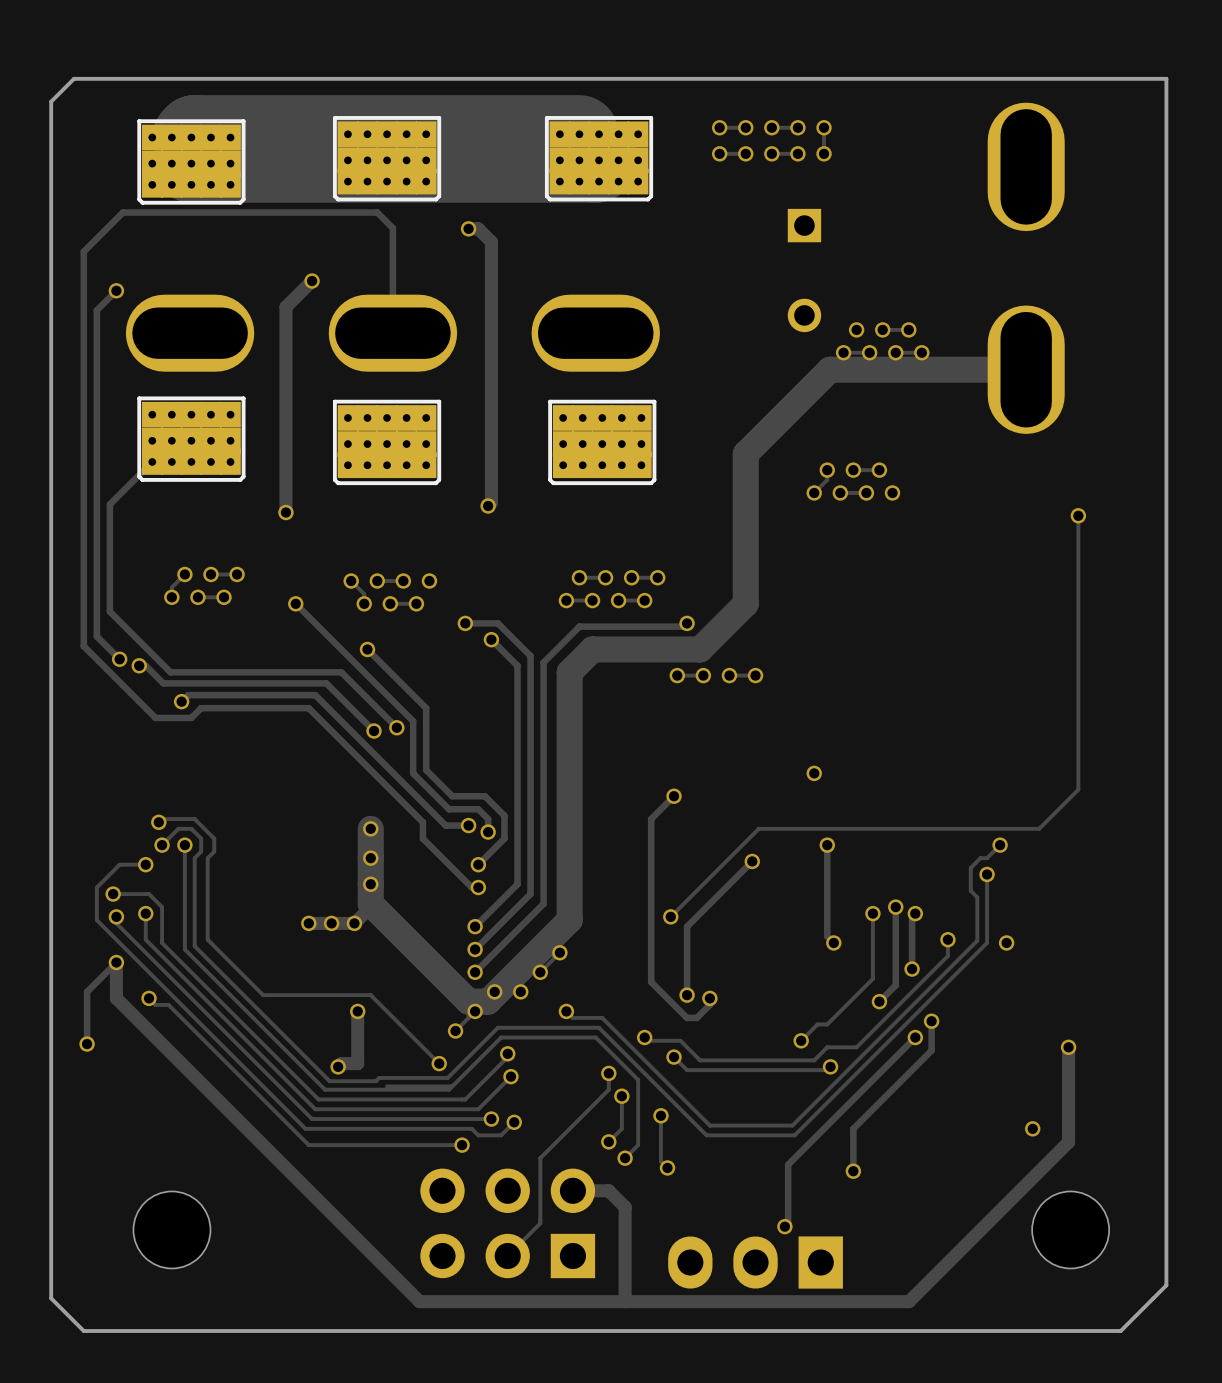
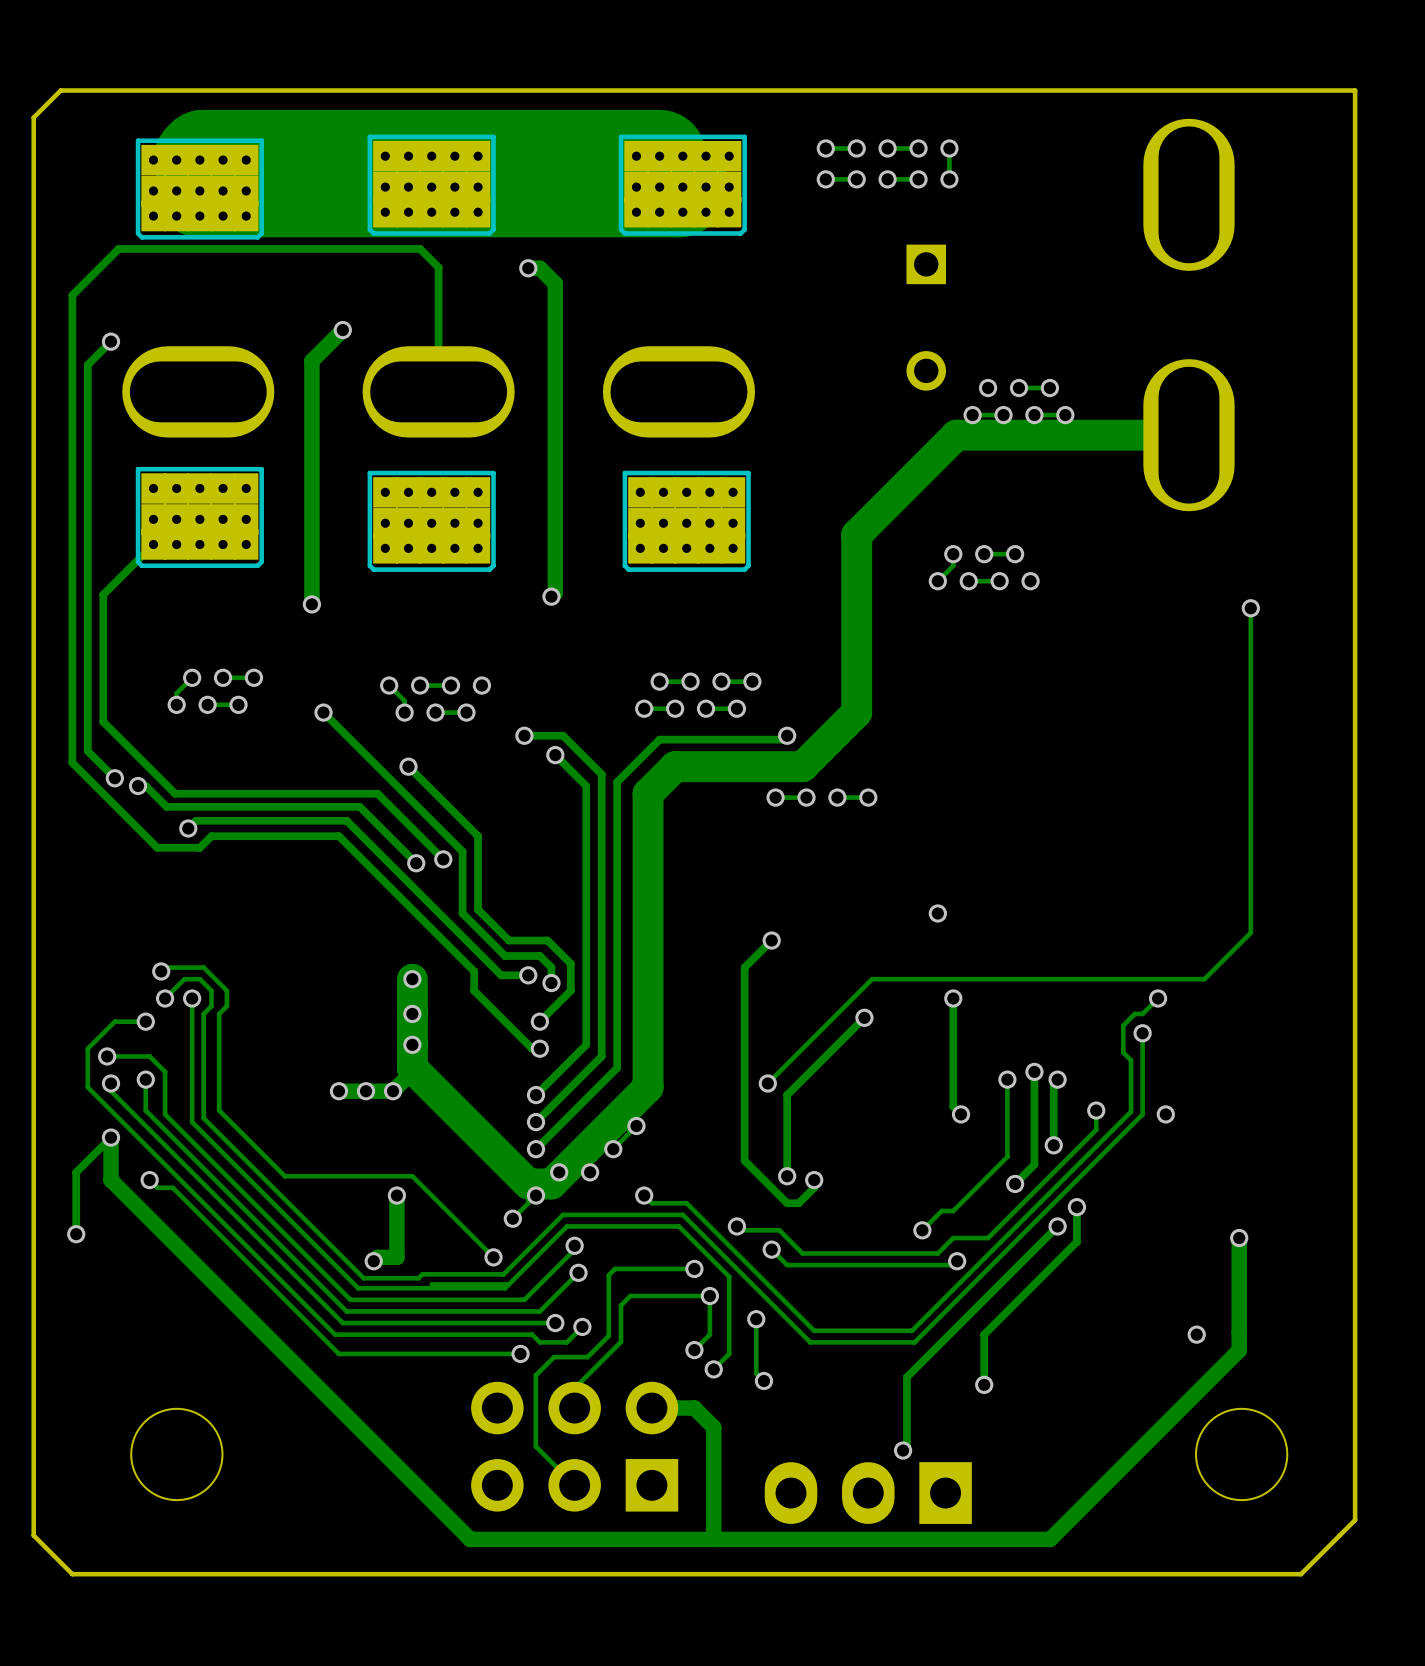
track: (608, 1073) (608, 1089) (540, 1158) (540, 1223) (507, 1256) -> (694, 1268) (614, 1268) (608, 1275) (608, 1335) (587, 1357) (554, 1357) (535, 1375) (535, 1446) (574, 1485)
track: none -> (709, 1296) (630, 1296) (621, 1305) (621, 1341) (574, 1388) (574, 1408)

